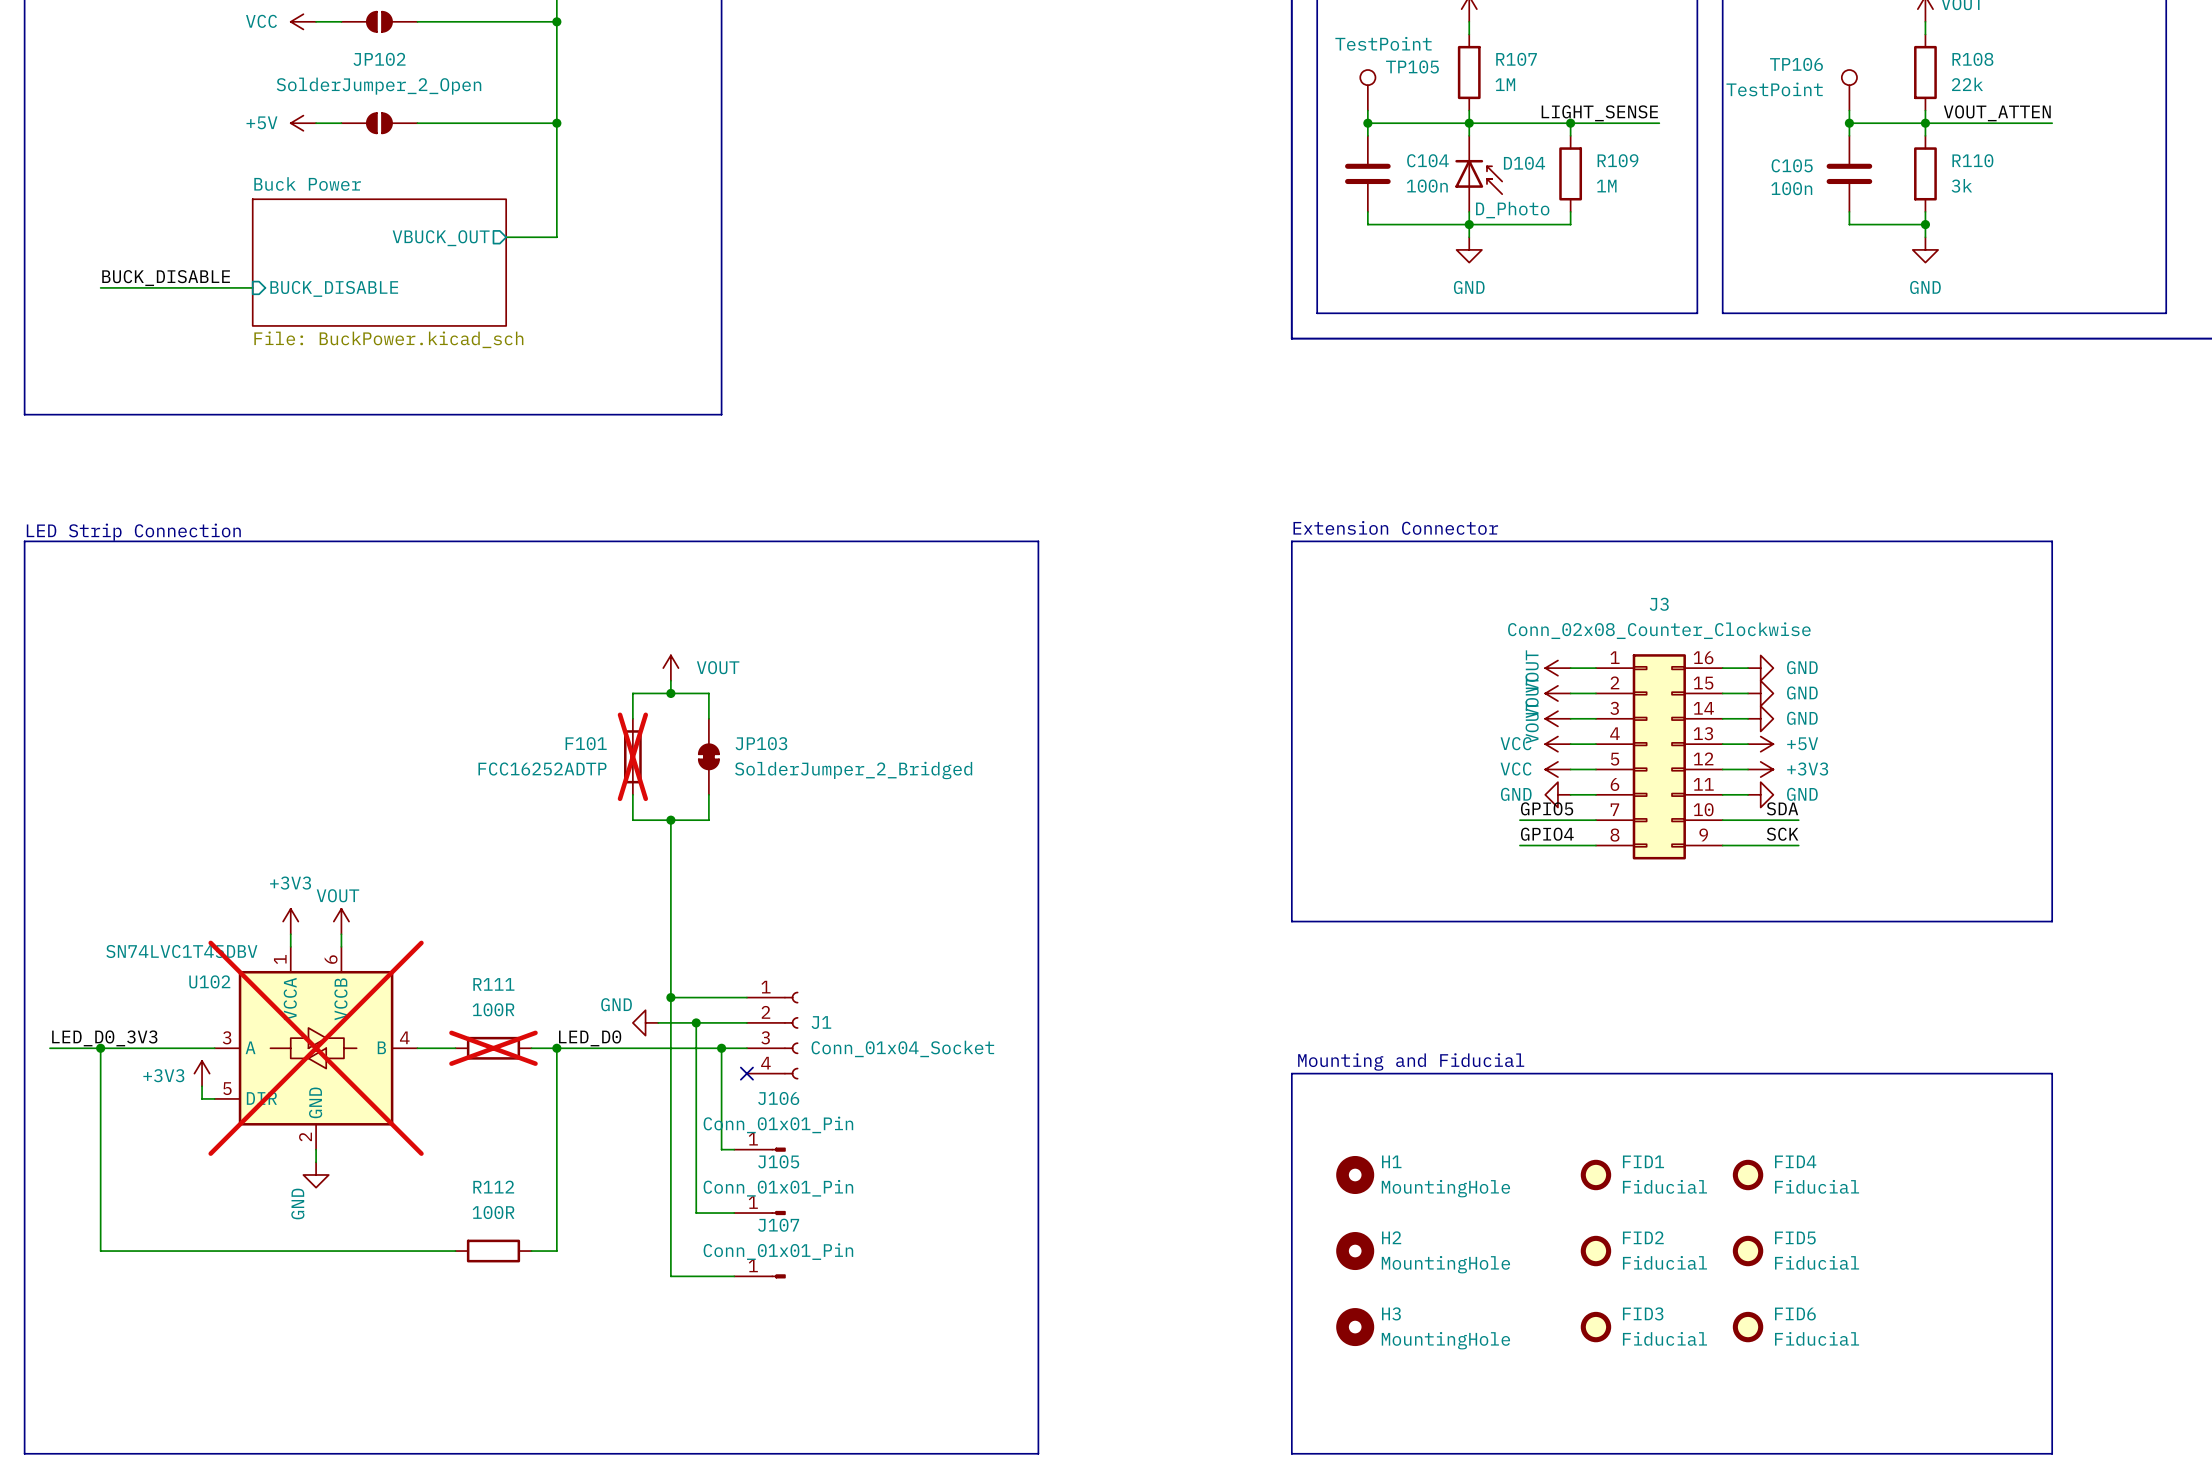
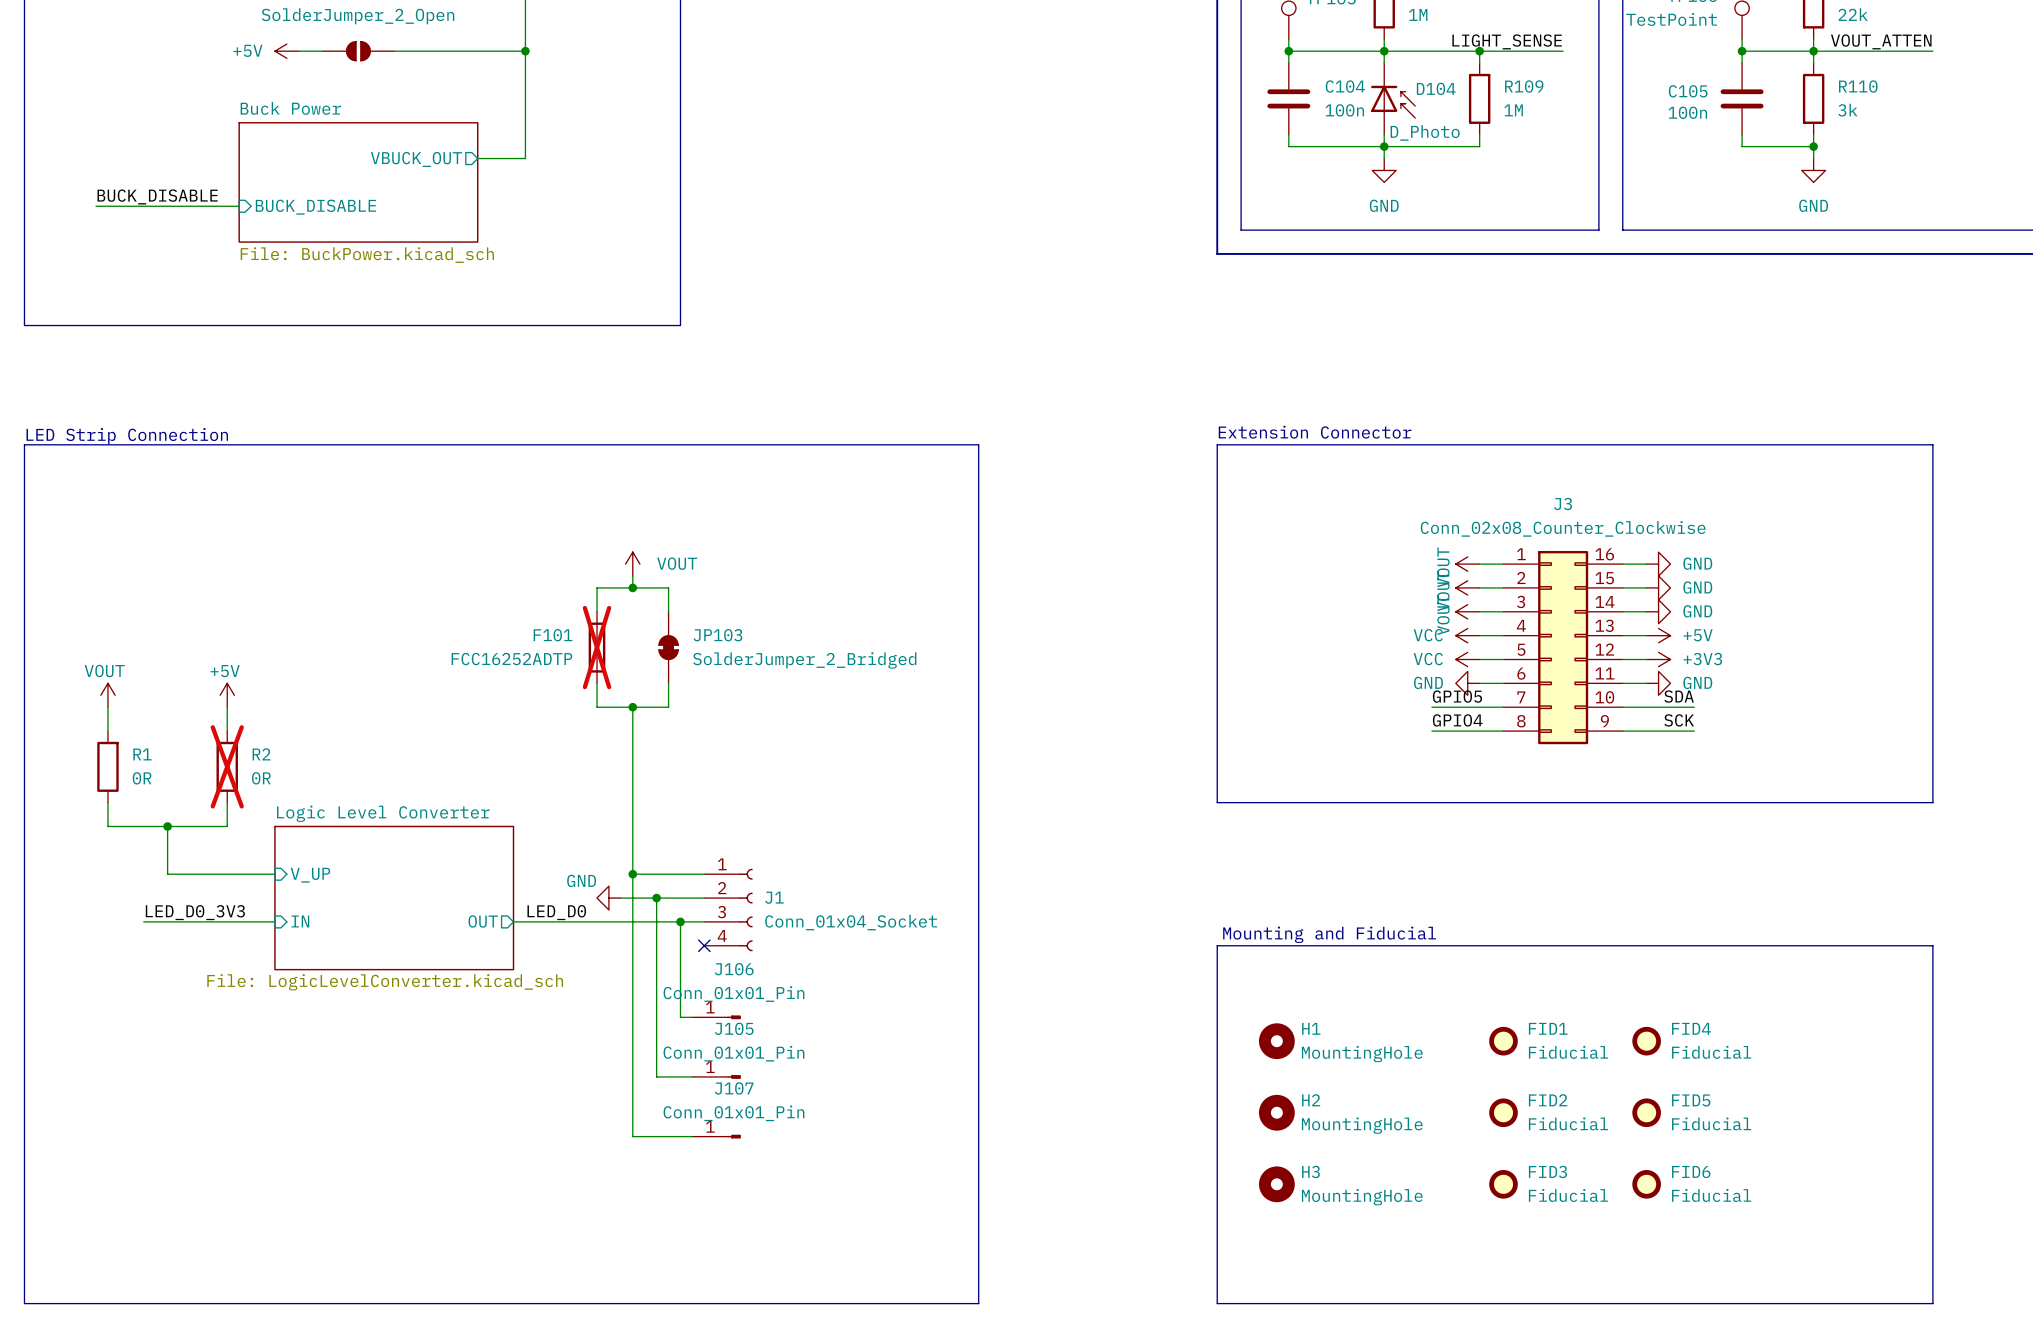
power symbol: none -> VOUT (107, 695)
power symbol: none -> +5V (227, 695)
wire: none -> (107, 707) (107, 731)
wire: none -> (227, 707) (227, 731)
R1: none -> 0R (107, 766)
R2: none -> 0R (227, 766)
wire: none -> (107, 802) (107, 826) (227, 826) (227, 802)
power symbol: +3V3 (290, 921) -> none
power symbol: VOUT (341, 921) -> none
wire: (290, 934) (290, 946) -> none
wire: (341, 934) (341, 946) -> none
wire: none -> (167, 826) (167, 874) (274, 874)
junction: none -> (167, 826)
sheet pin: none -> V_UP (310, 875)
sheet Logic Level Converter: none -> File: LogicLevelConverter.kicad_sch (394, 898)
label position: LED_D0_3V3 (104, 1038) -> LED_D0_3V3 (195, 912)
sheet pin: none -> IN (300, 921)
sheet pin: none -> OUT (483, 921)
wire: (49, 1048) (151, 1048) -> none
wire: (100, 1048) (100, 1251) (455, 1251) -> none
junction: (100, 1048) -> none
U102: SN74LVC1T45DBV (316, 1048) -> none
wire: (417, 1048) (455, 1048) -> none
R111: 100R (493, 1048) -> none
wire: (531, 1048) (544, 1048) -> none
wire: (556, 1048) (556, 1251) (531, 1251) -> none
junction: (556, 1048) -> none
power symbol: +3V3 (202, 1073) -> none
wire: (202, 1086) (202, 1098) (214, 1098) -> none
wire: (316, 1149) (316, 1162) -> none
power symbol: GND (316, 1174) -> none
R112: 100R (493, 1251) -> none

